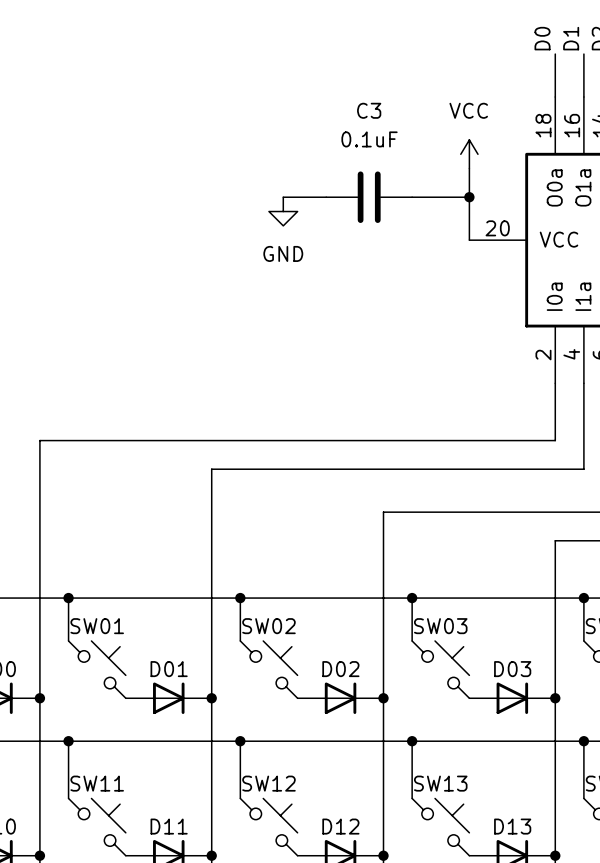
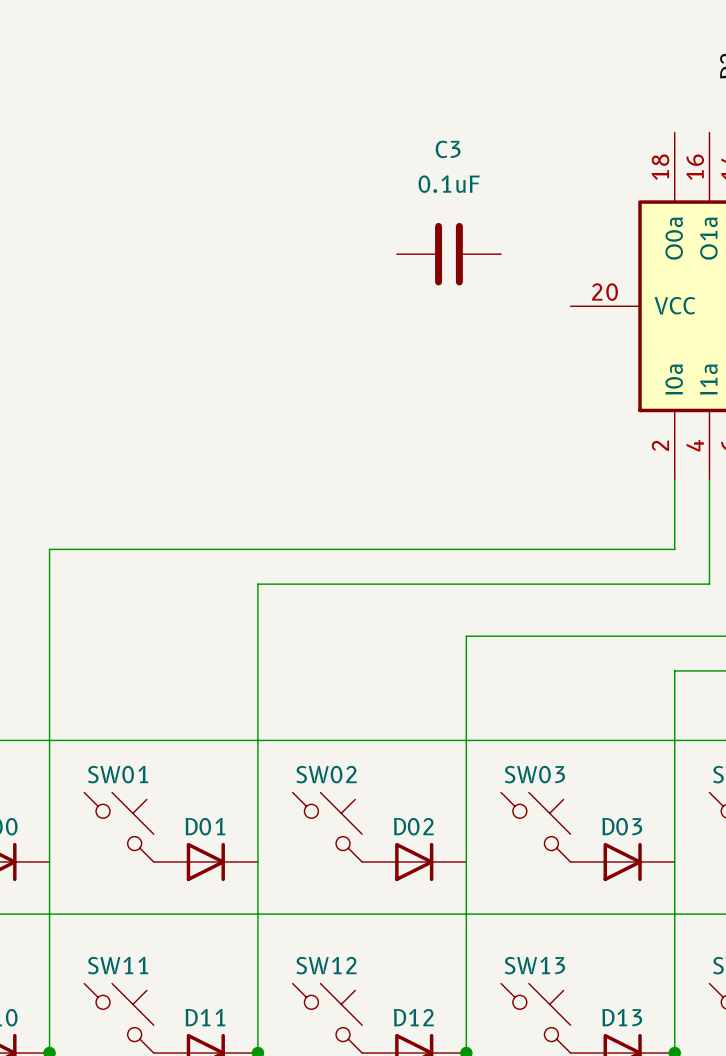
label: D0 (542, 38) -> none
label: D1 (571, 38) -> none
wire: (555, 54) (555, 97) -> none
wire: (583, 54) (583, 97) -> none
power symbol: VCC (469, 154) -> none
wire: (469, 168) (469, 240) -> none
wire: (283, 197) (326, 197) -> none
wire: (412, 197) (469, 197) -> none
junction: (469, 197) -> none
power symbol: GND (283, 211) -> none
wire: (68, 598) (68, 640) -> none
junction: (68, 598) -> none
wire: (240, 598) (240, 640) -> none
junction: (240, 598) -> none
wire: (412, 598) (412, 640) -> none
junction: (412, 598) -> none
wire: (583, 598) (583, 640) -> none
junction: (583, 598) -> none
junction: (39, 698) -> none
junction: (211, 698) -> none
junction: (383, 698) -> none
junction: (555, 698) -> none
wire: (68, 741) (68, 798) -> none
junction: (68, 741) -> none
wire: (240, 741) (240, 798) -> none
junction: (240, 741) -> none
wire: (412, 741) (412, 798) -> none
junction: (412, 741) -> none
wire: (583, 741) (583, 798) -> none
junction: (583, 741) -> none

